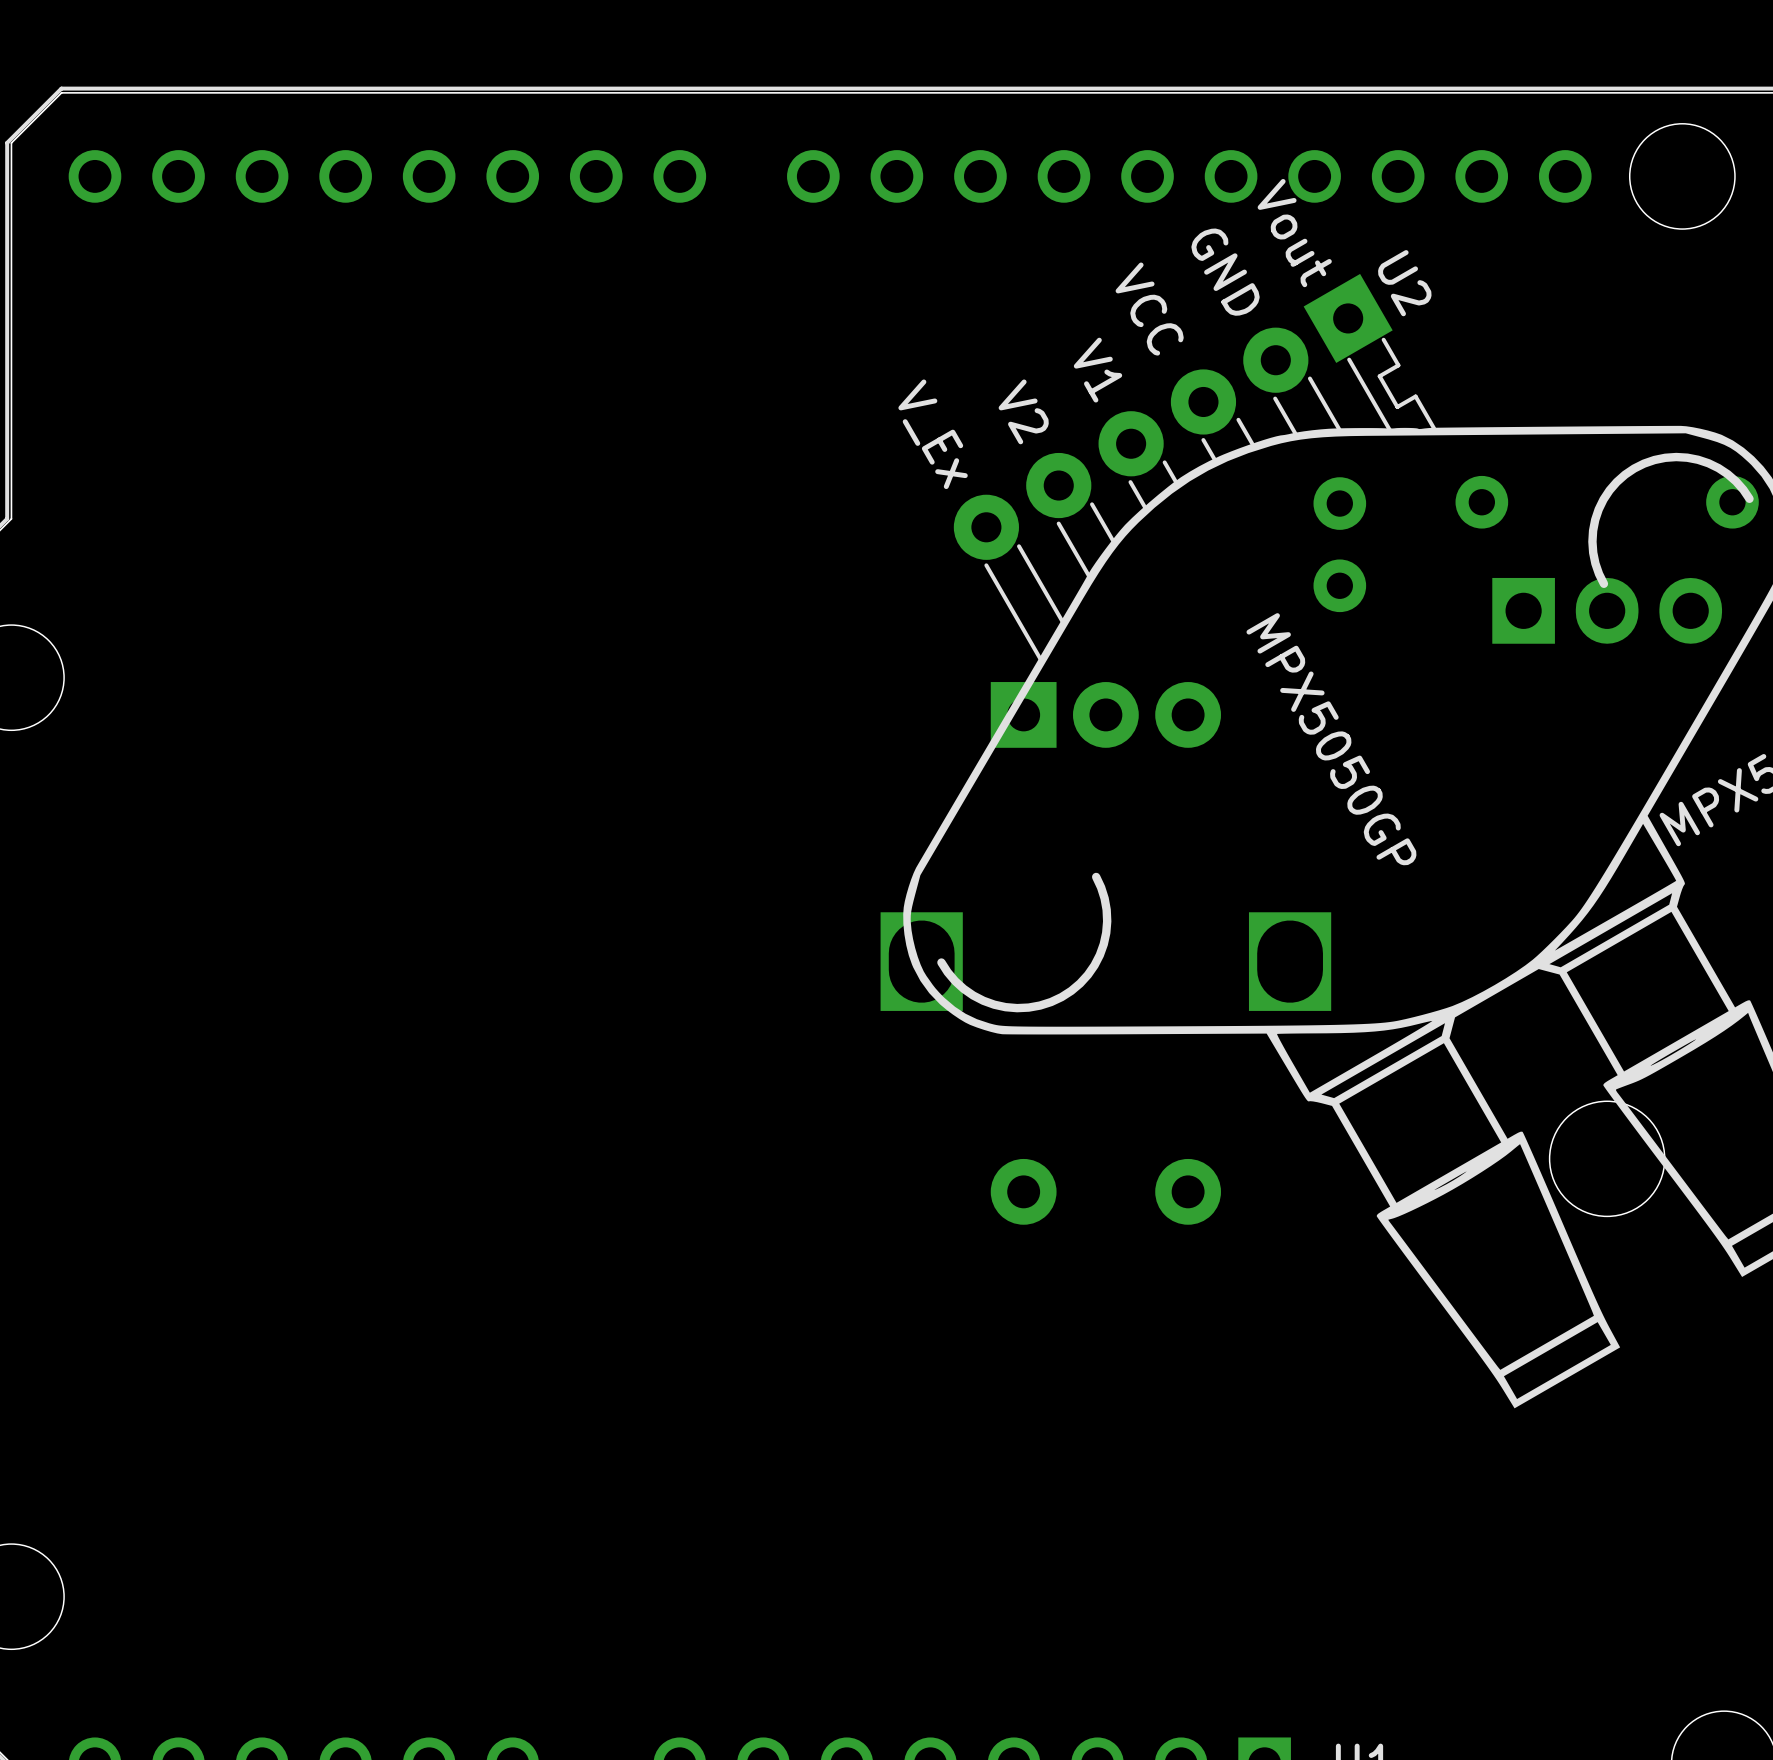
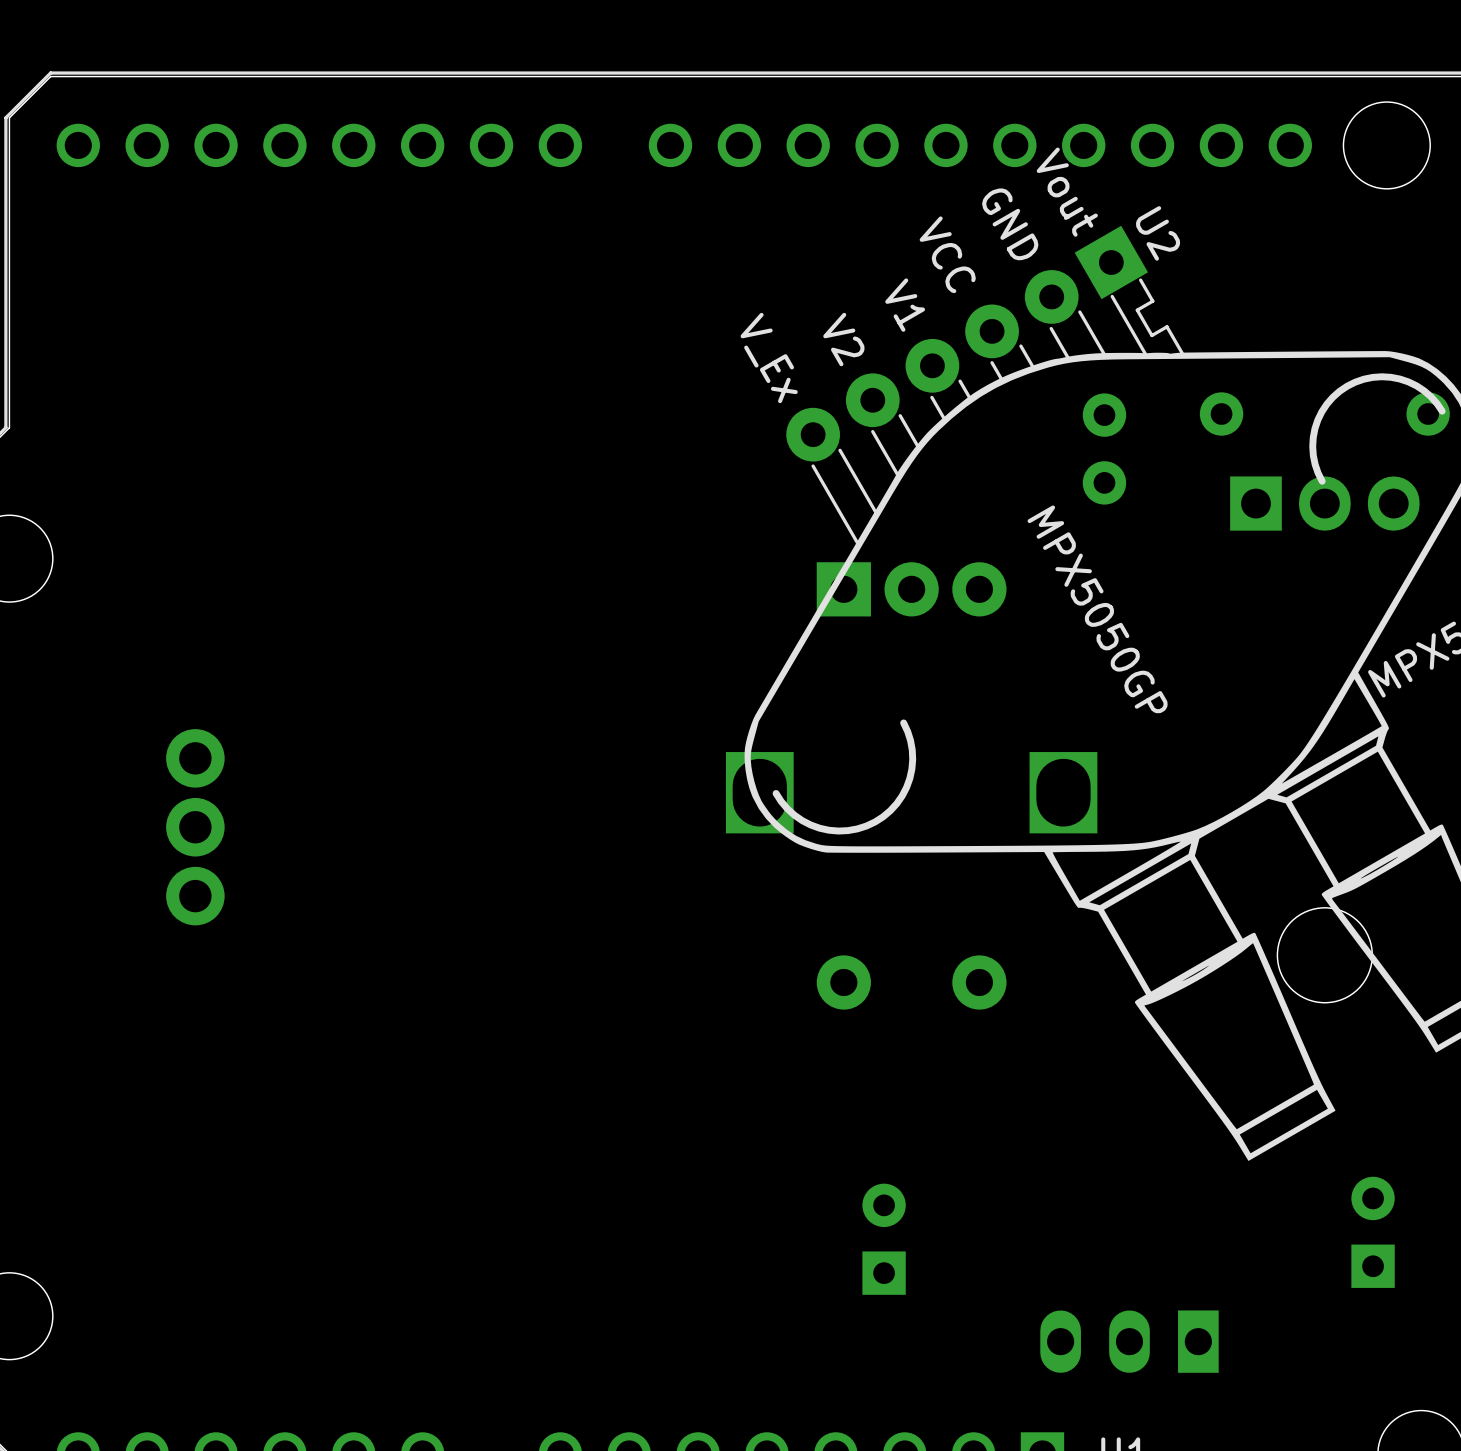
part: none -> (195, 827)
part: none -> (1373, 1232)
part: none -> (884, 1239)
part: none -> (1129, 1341)

